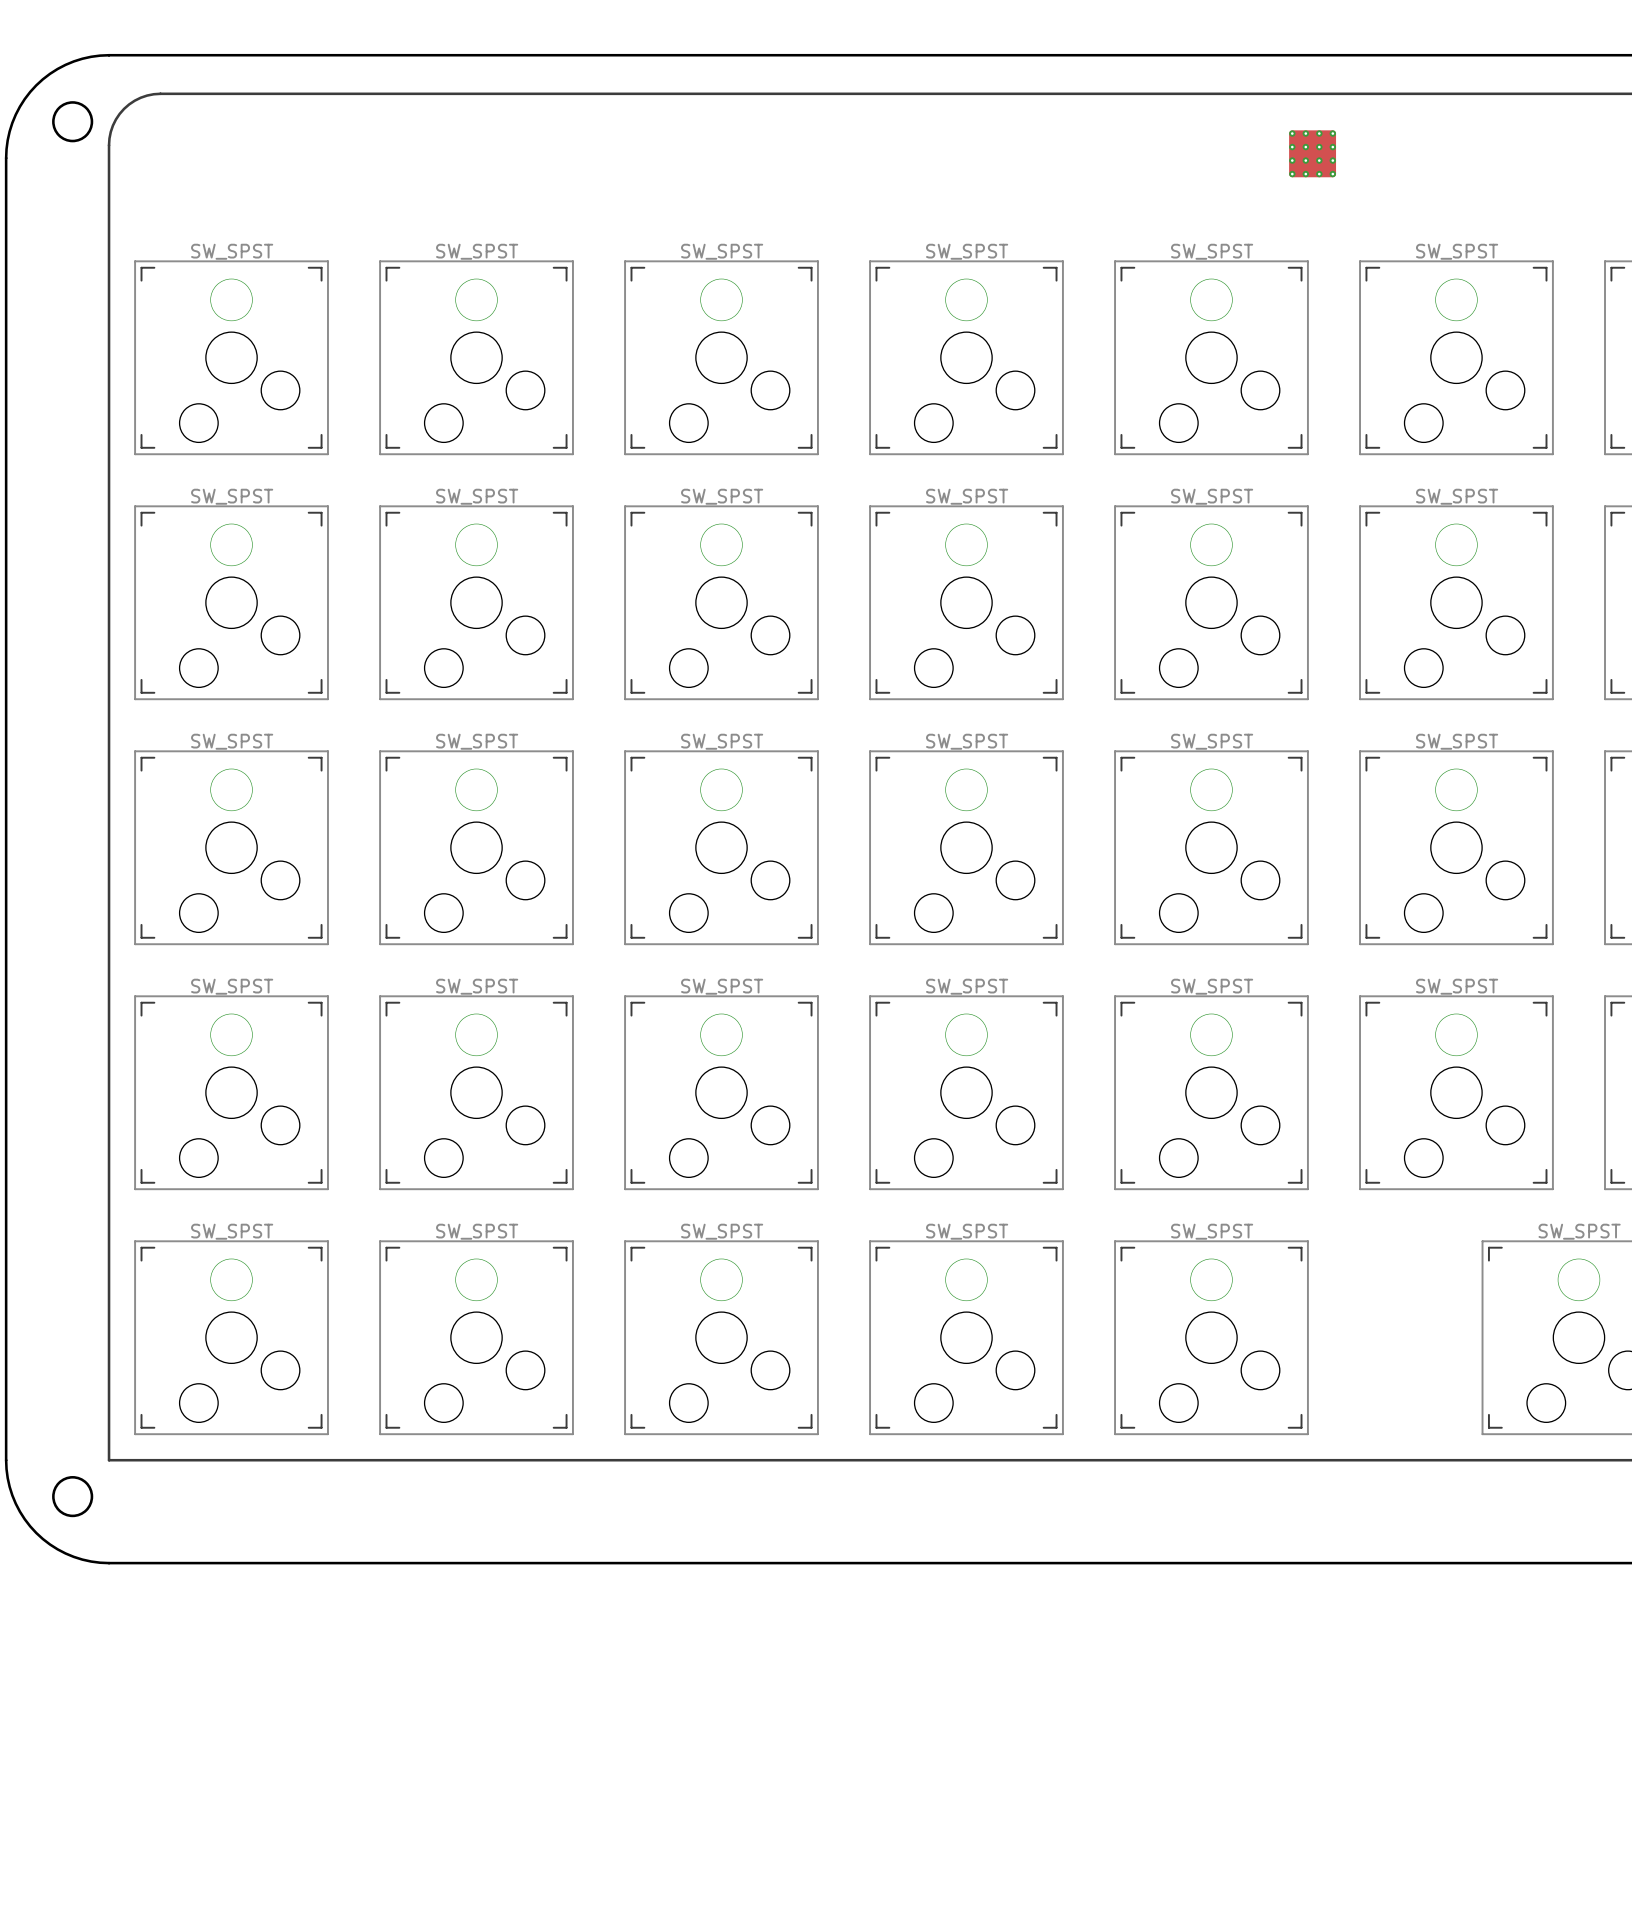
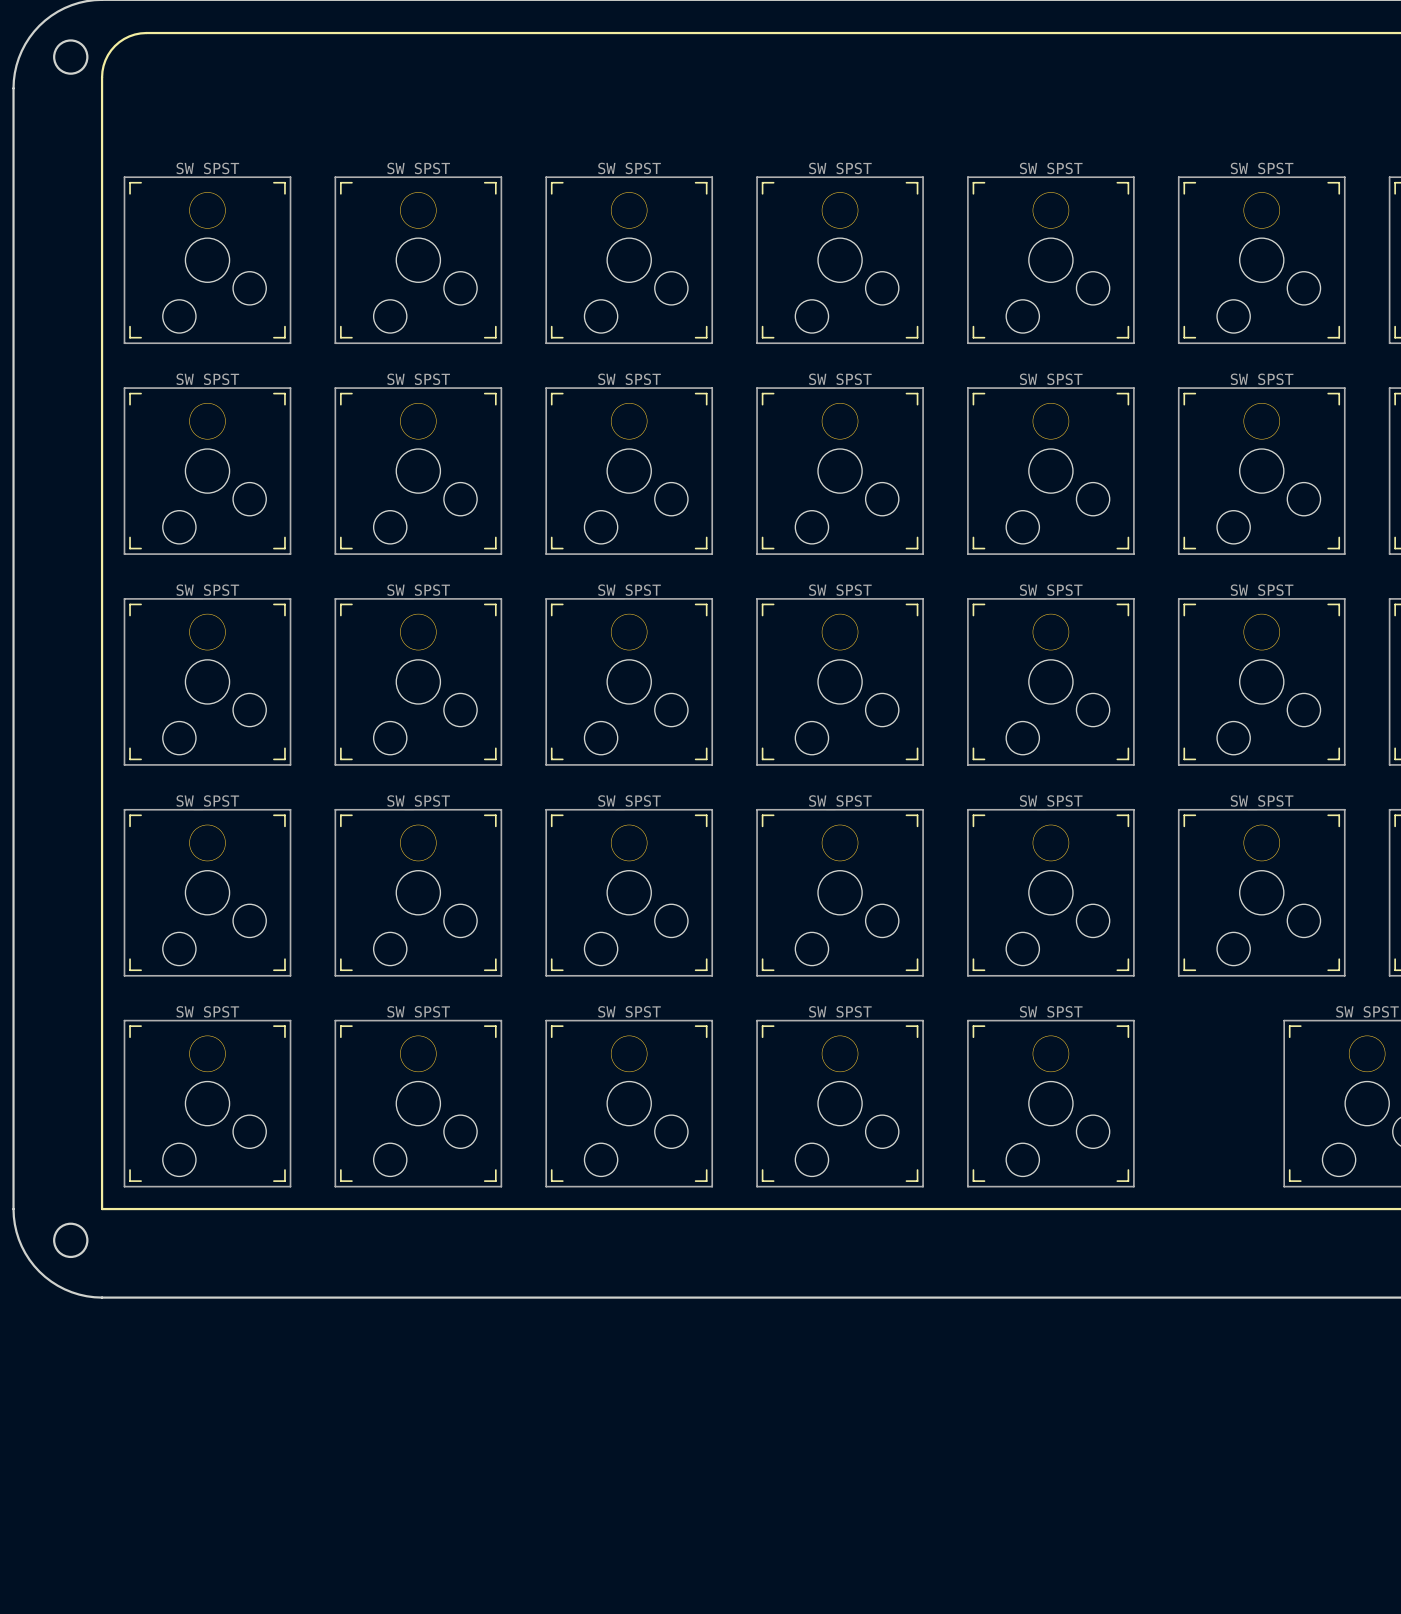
part: (1312, 153) -> none

